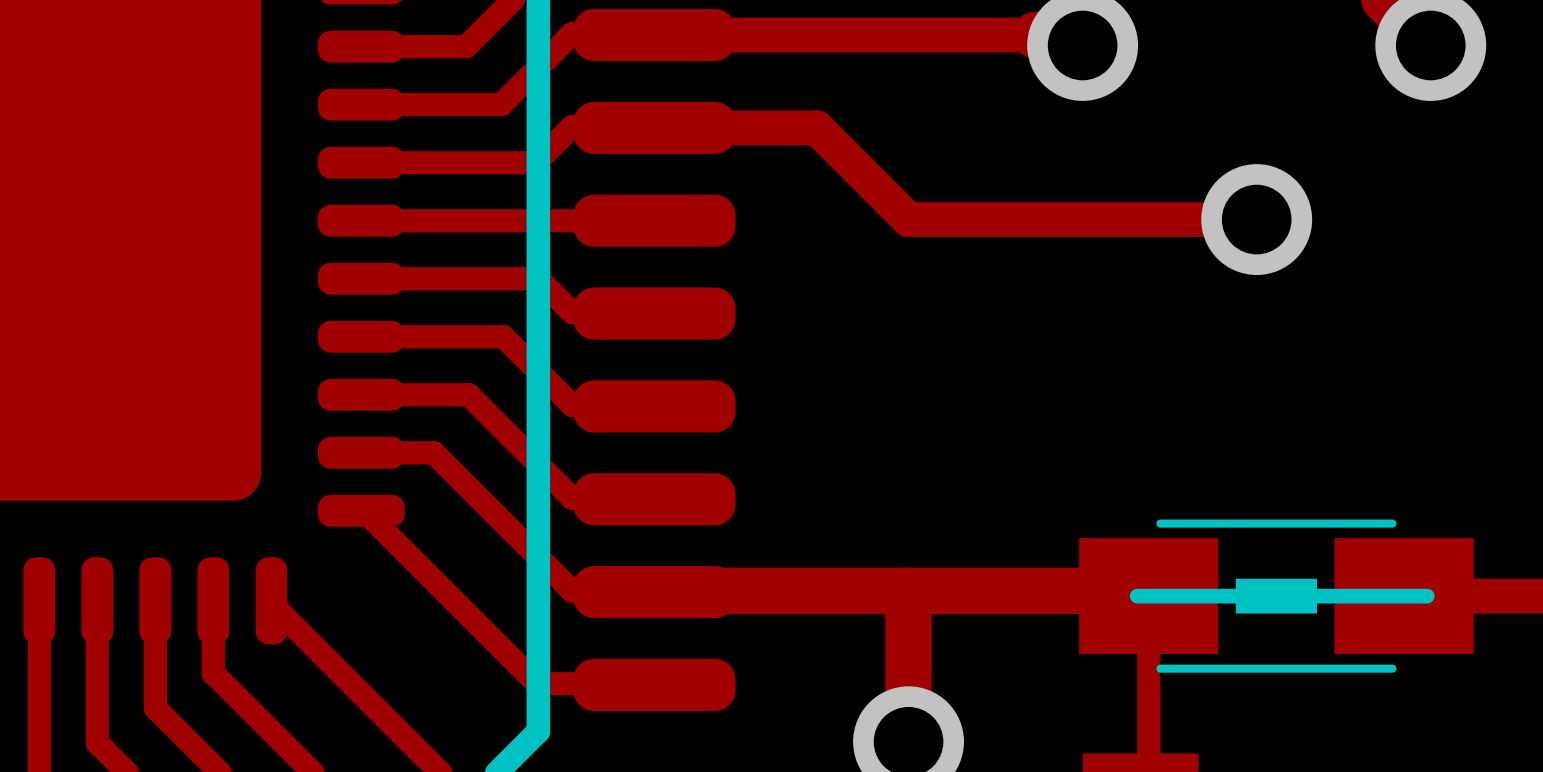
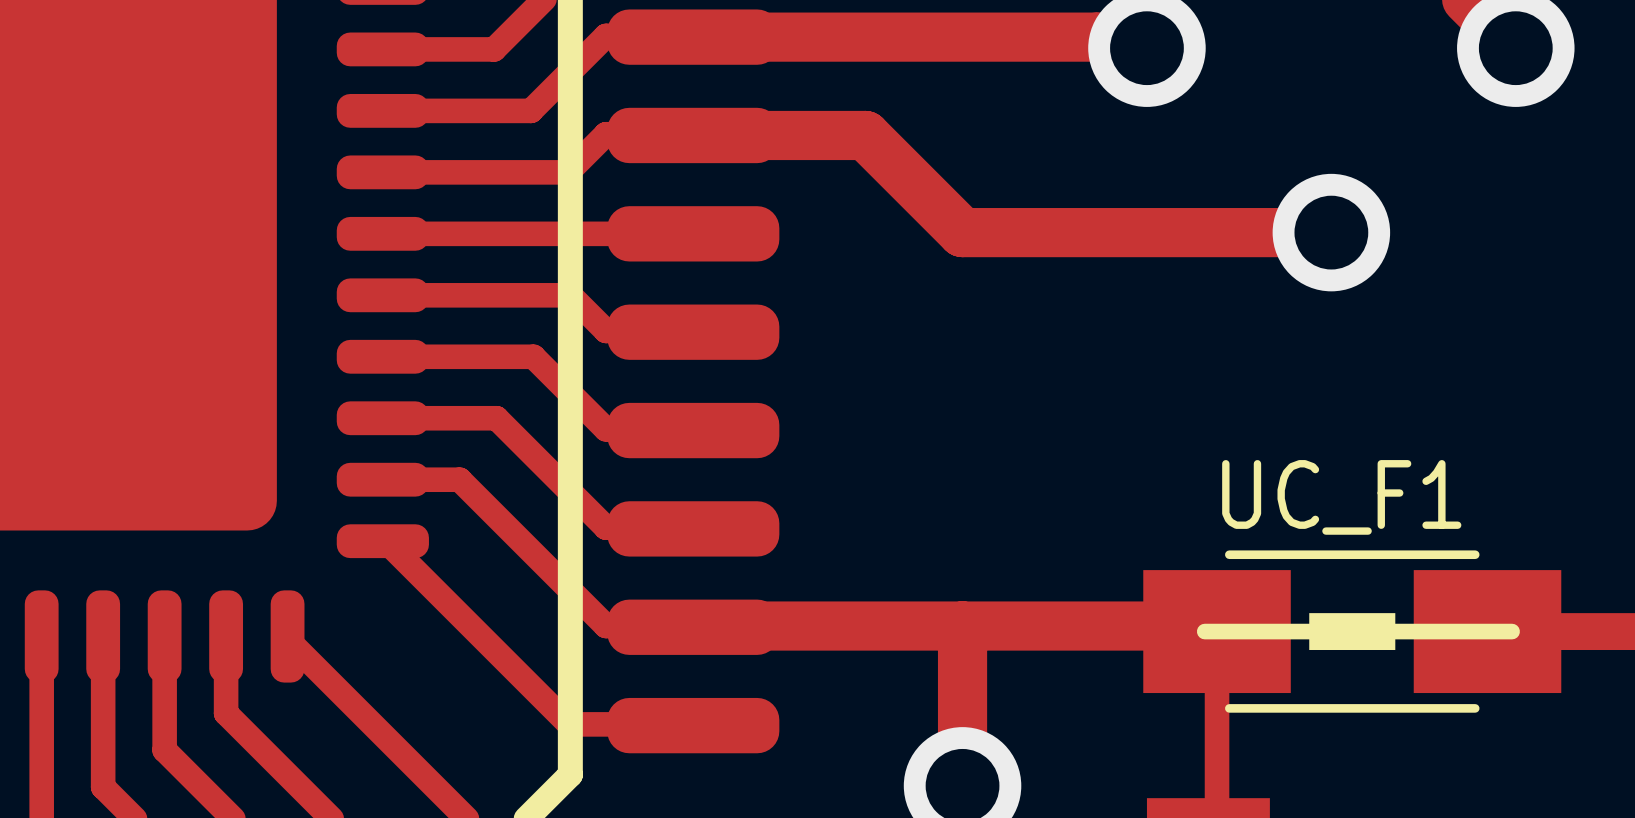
track width: thin (654, 35) (1035, 35) -> thick (693, 37) (1096, 37)
track width: thin (654, 127) (816, 127) (908, 219) (1256, 219) -> thick (693, 135) (865, 135) (962, 232) (1331, 232)
UC_F1 name: none -> UC_F1 (1341, 497)

